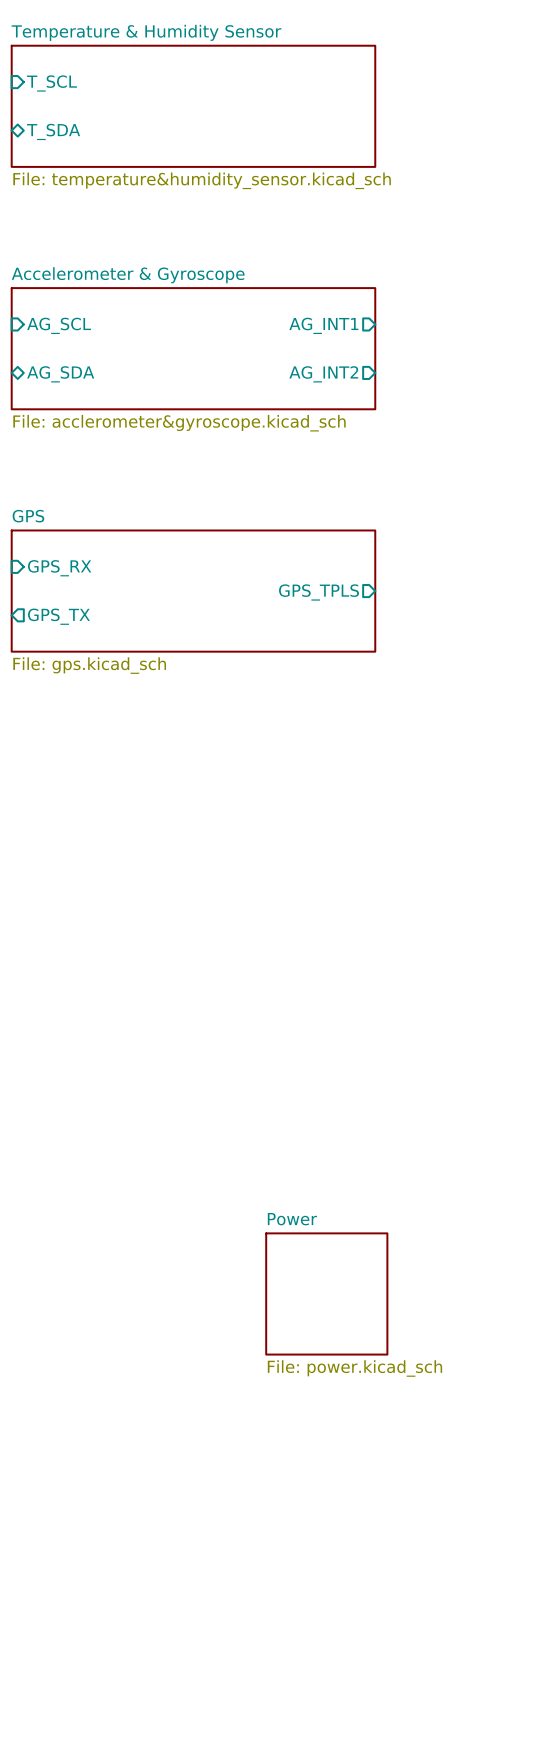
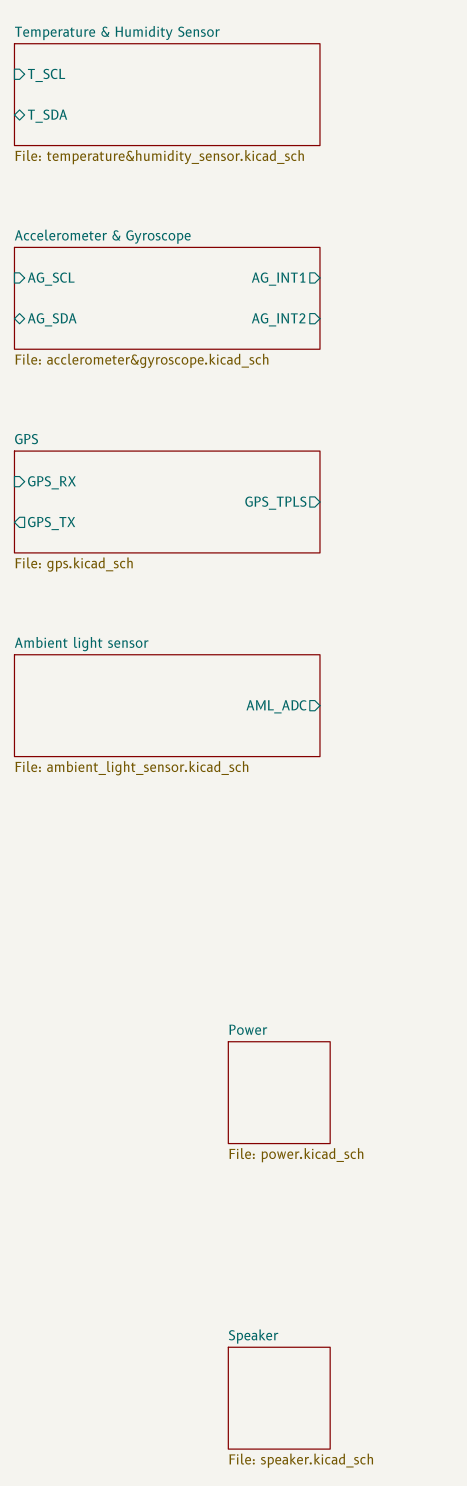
sheet Ambient light sensor: none -> File: ambient_light_sensor.kicad_sch (167, 705)
sheet pin: none -> AML_ADC (276, 706)
sheet Speaker: none -> File: speaker.kicad_sch (279, 1398)

